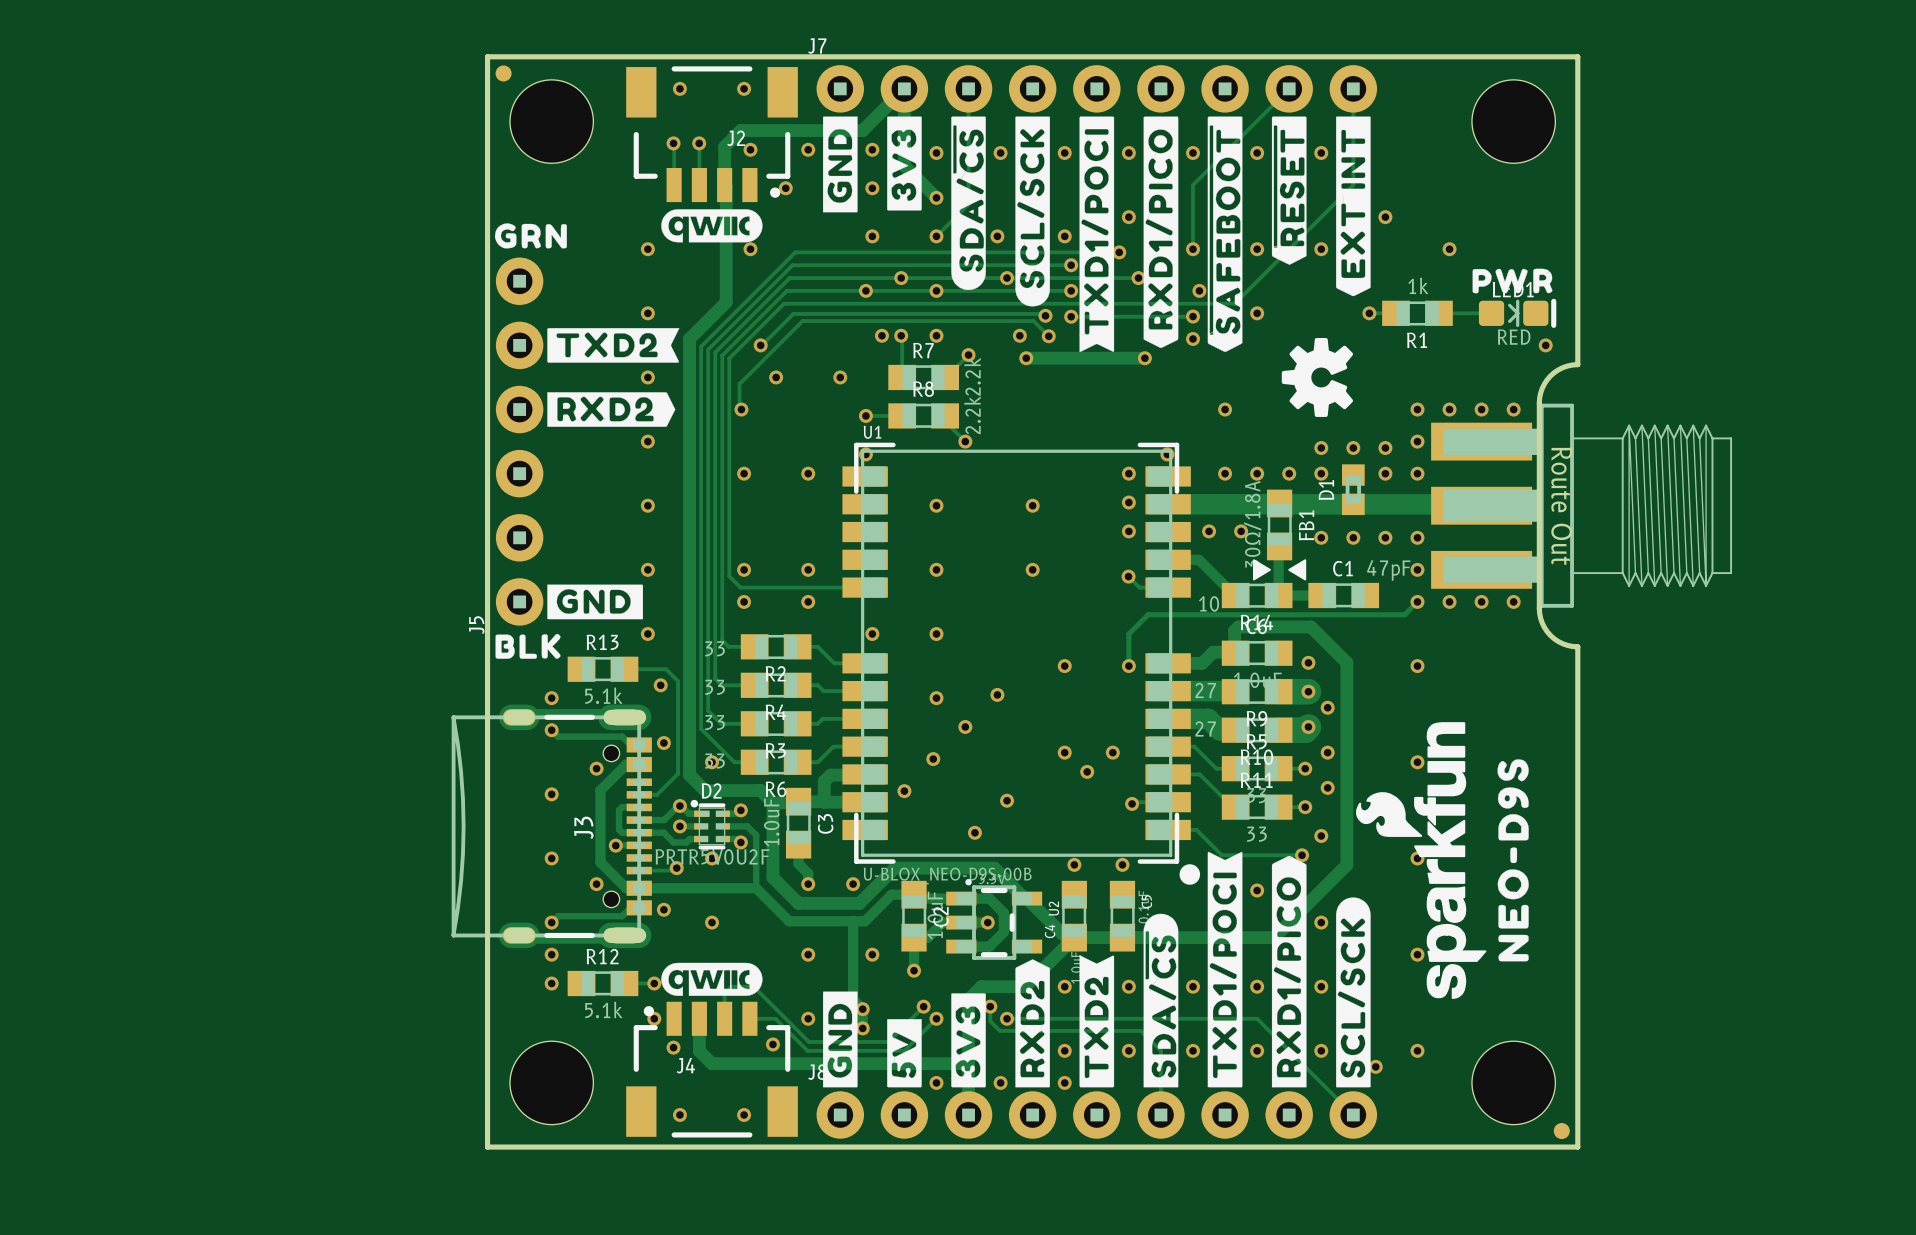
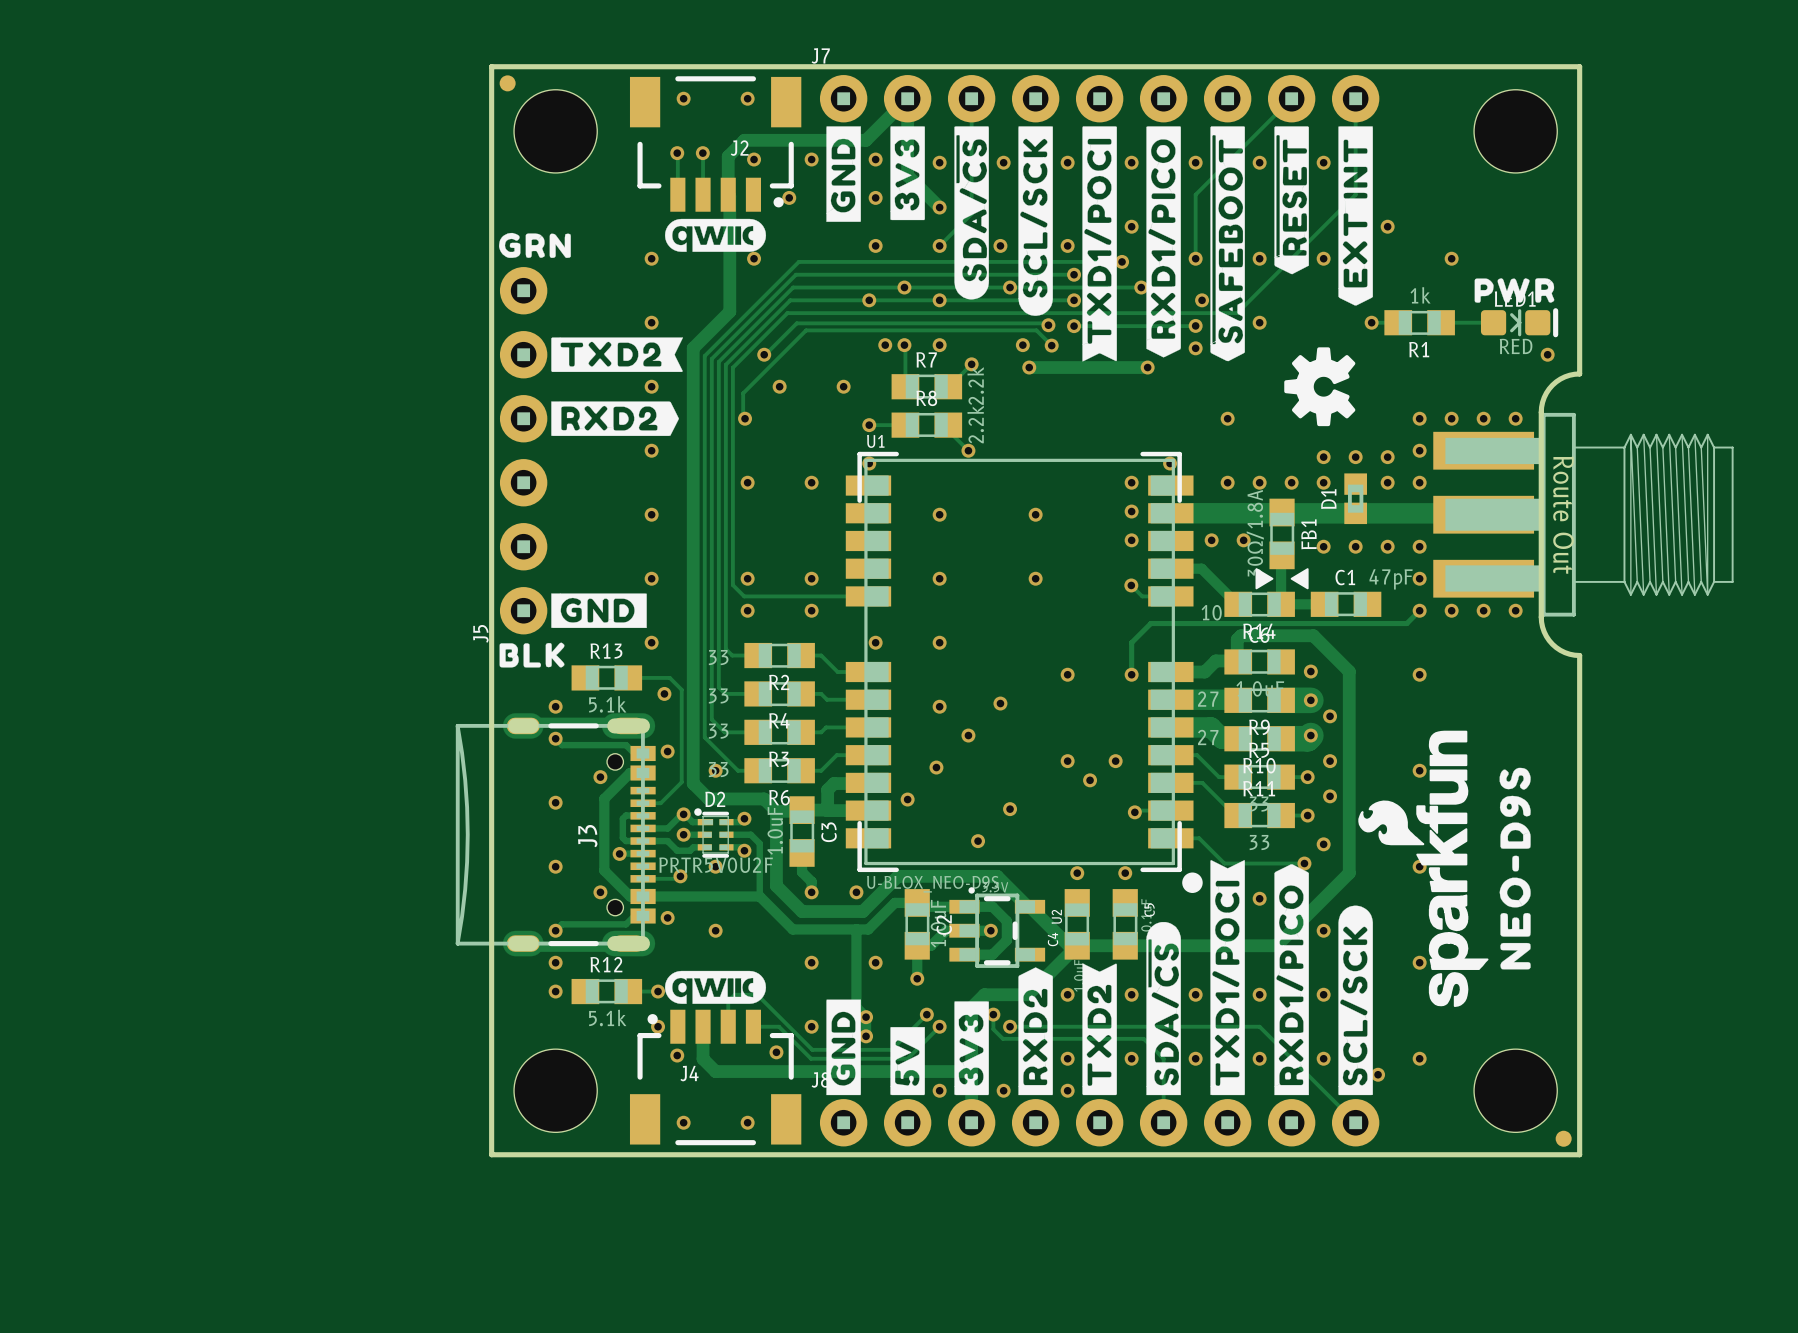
U1 value: U-BLOX_NEO-D9S-00B (947, 875) -> U-BLOX_NEO-D9S (932, 884)

